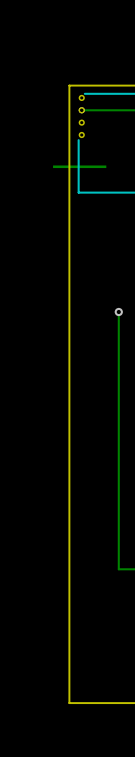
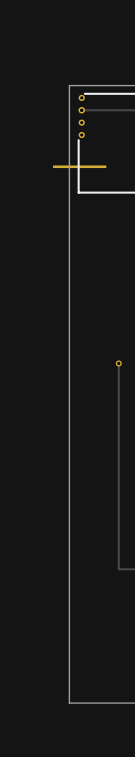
track: (118, 312) (118, 363) -> none
via: (118, 312) -> none
via: none -> (118, 363)

